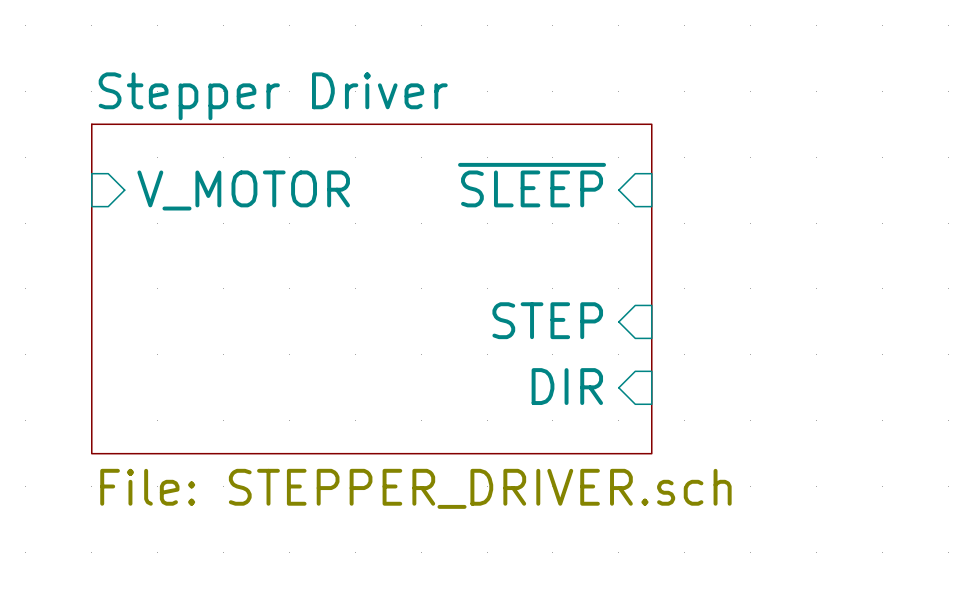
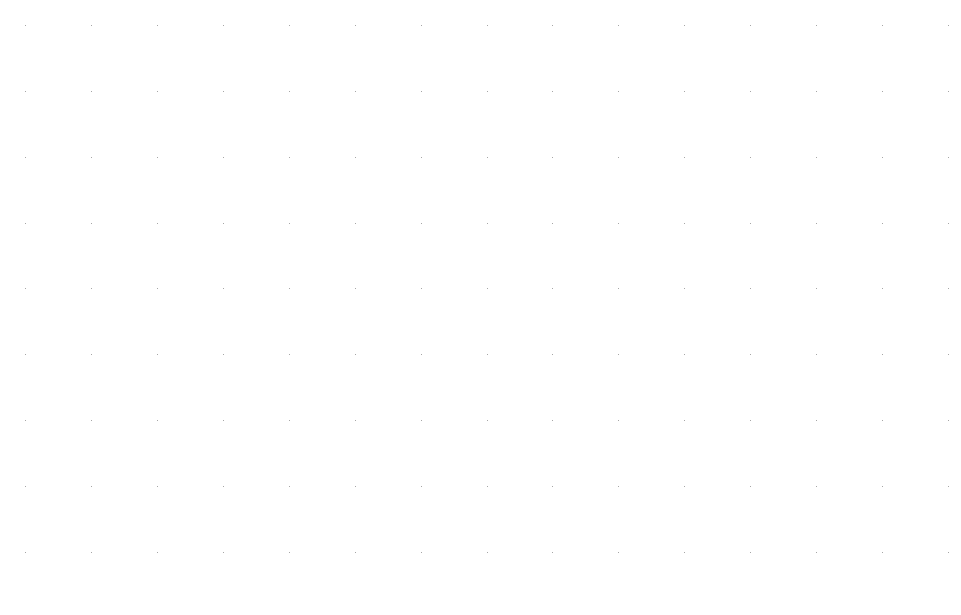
sheet pin: ~{SLEEP} (532, 185) -> none
sheet pin: V_MOTOR (243, 190) -> none
sheet Stepper Driver: File: STEPPER_DRIVER.sch (371, 288) -> none
sheet pin: STEP (547, 320) -> none
sheet pin: DIR (567, 386) -> none

